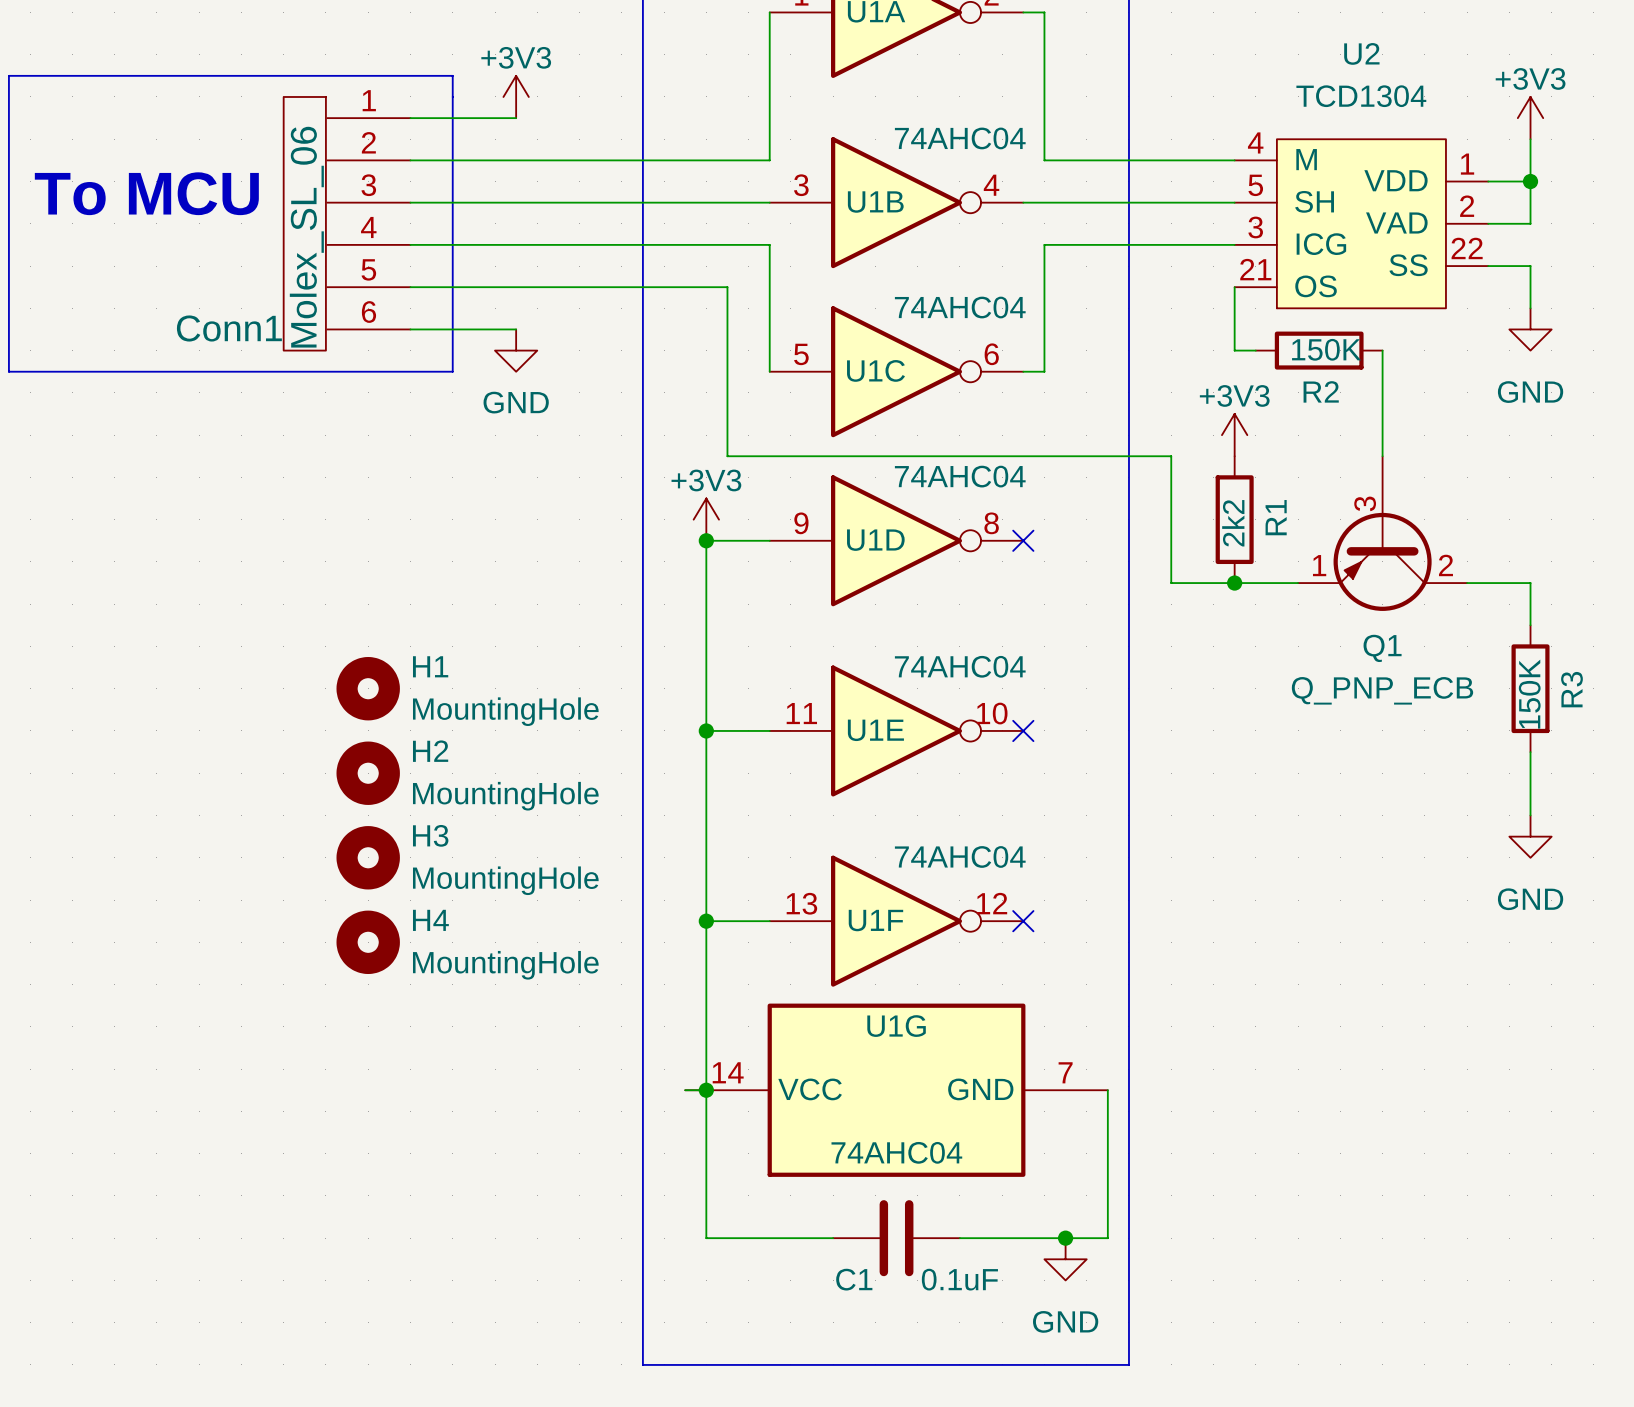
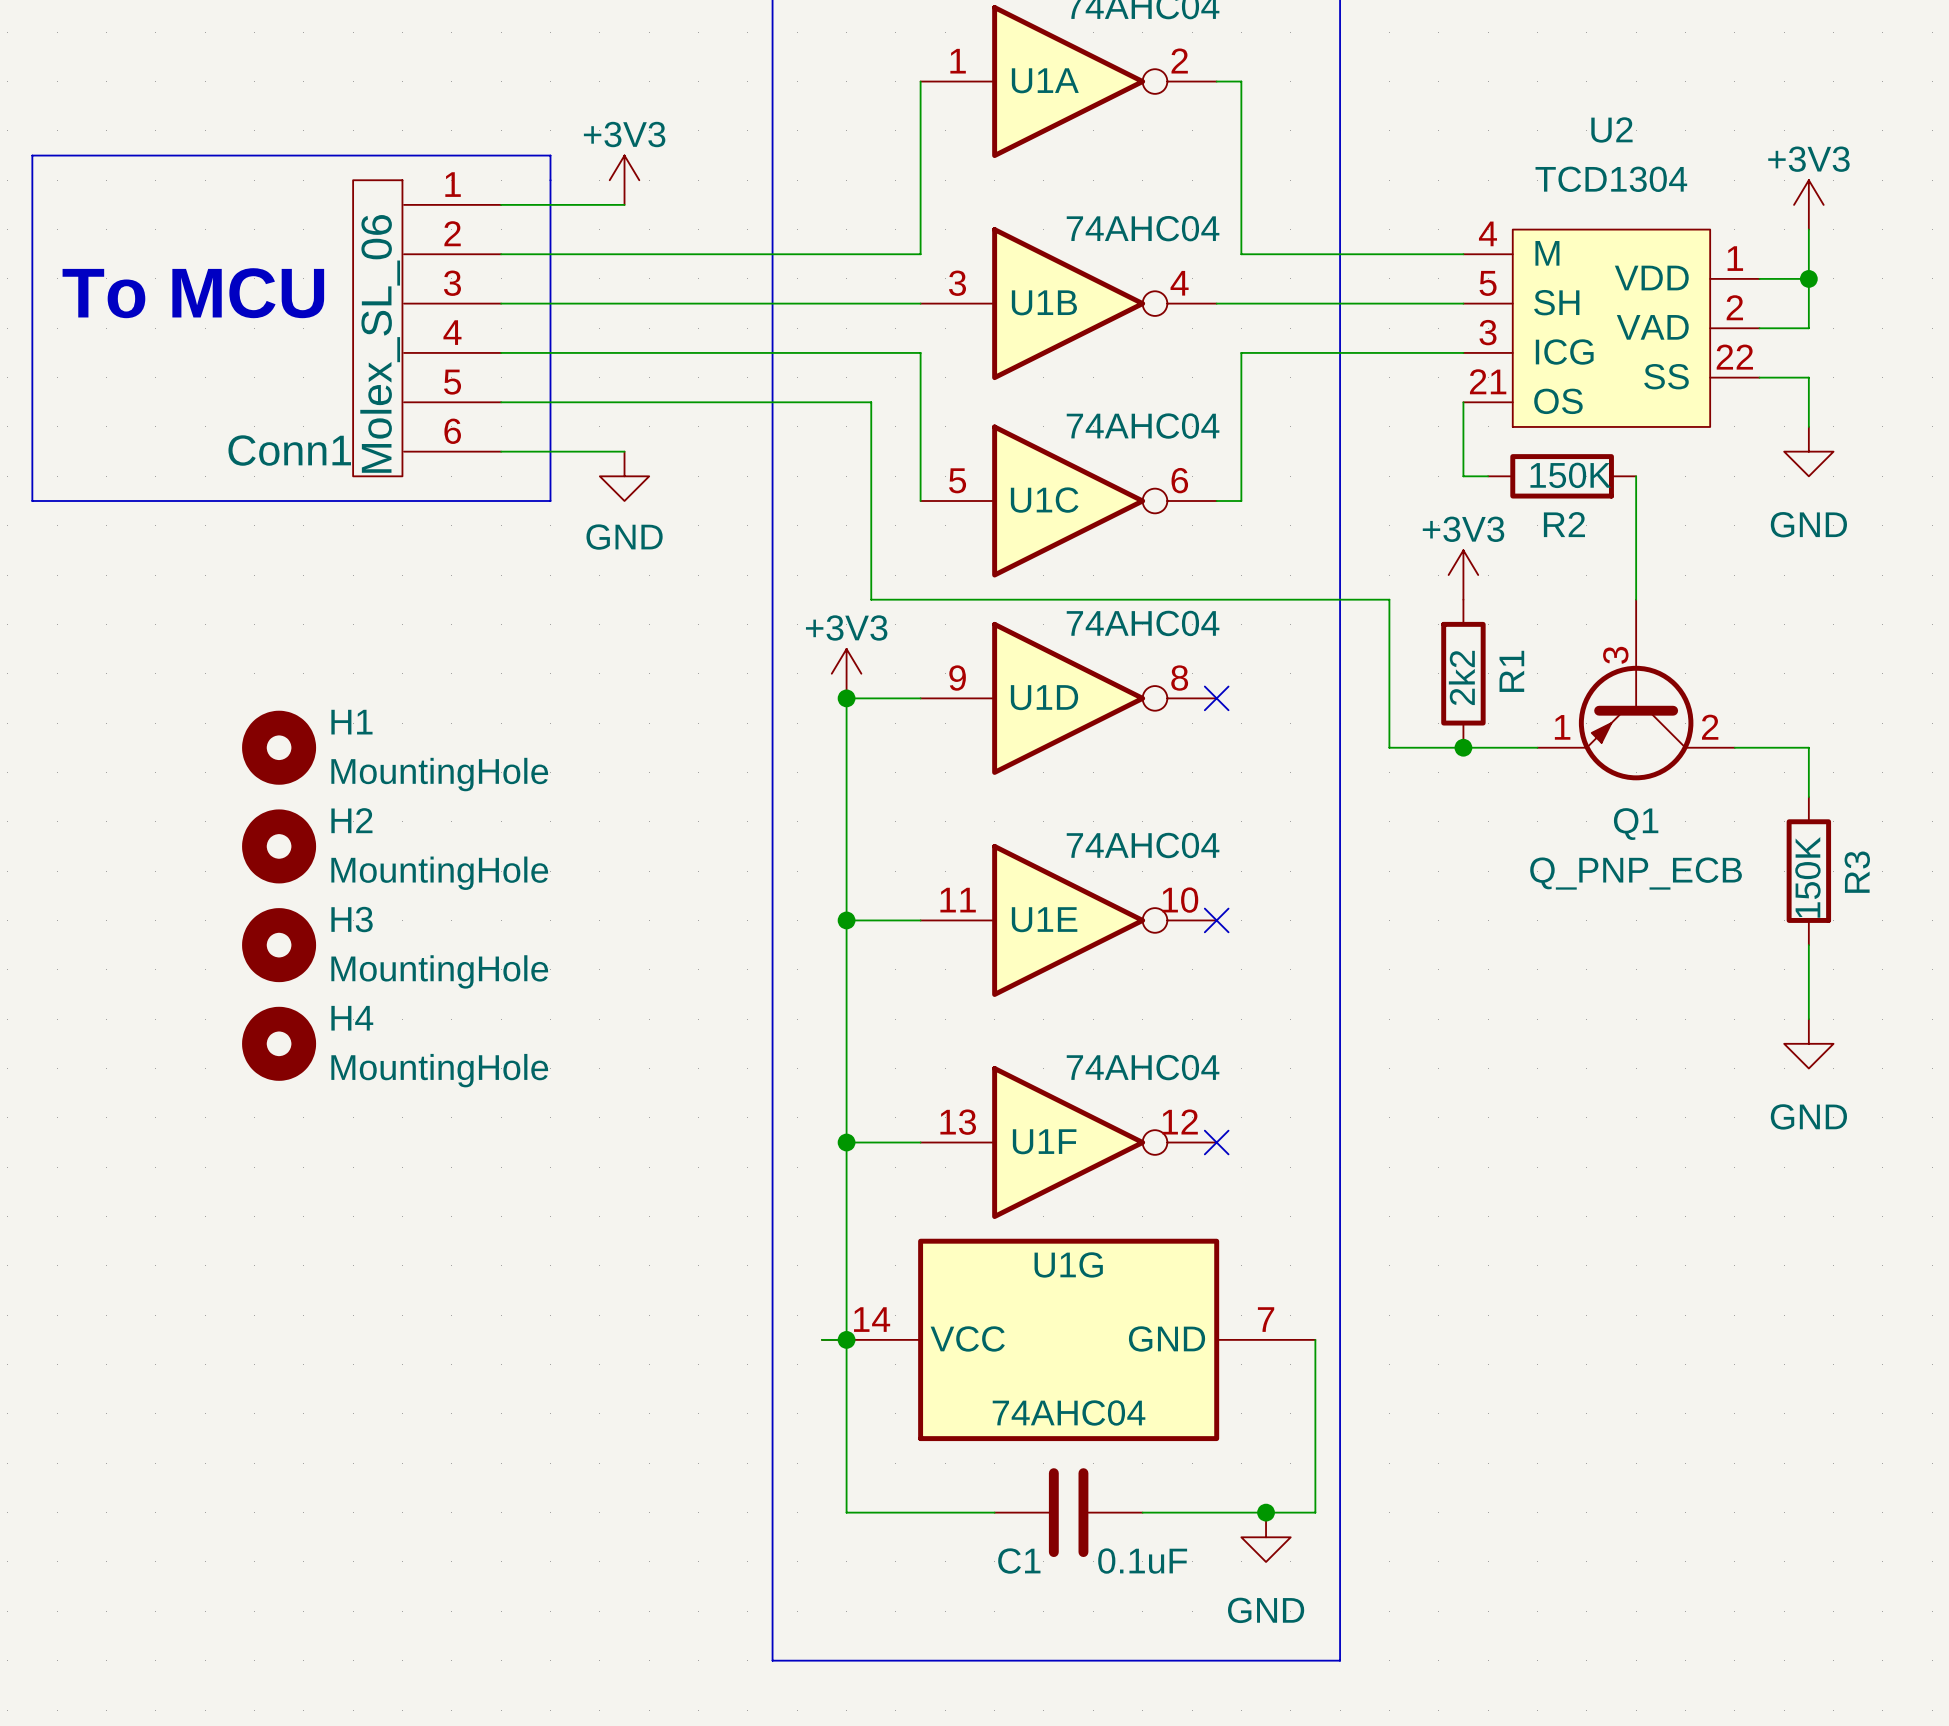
H1 position: (368, 688) -> (279, 747)
H2 position: (368, 773) -> (279, 846)
H3 position: (368, 857) -> (279, 945)
H4 position: (368, 942) -> (279, 1043)

